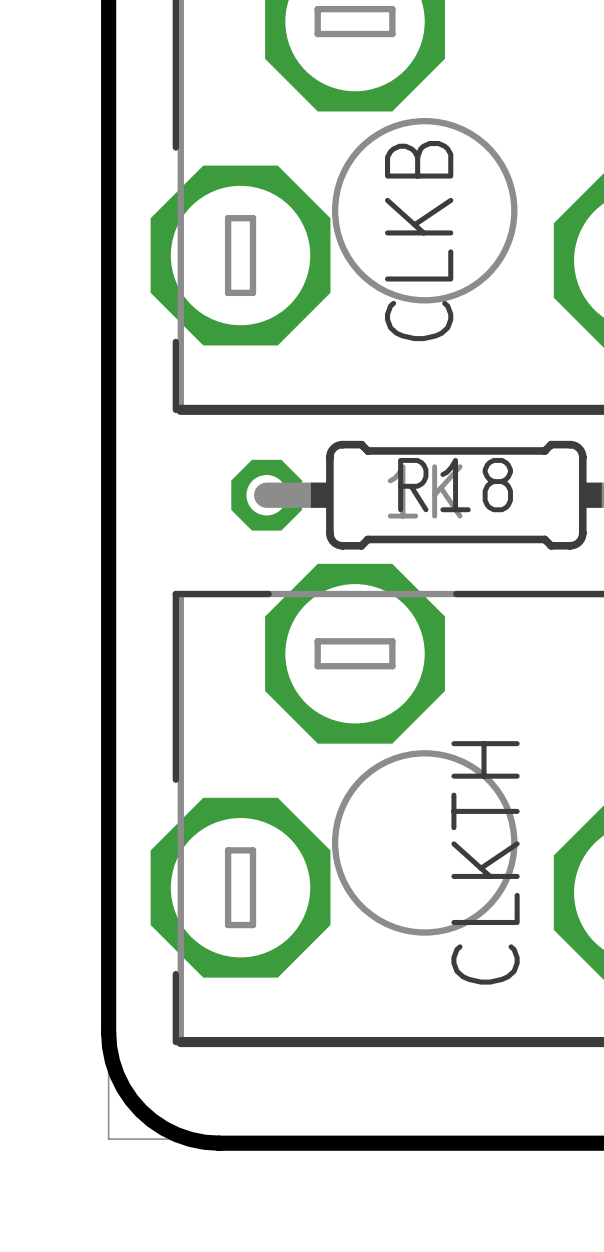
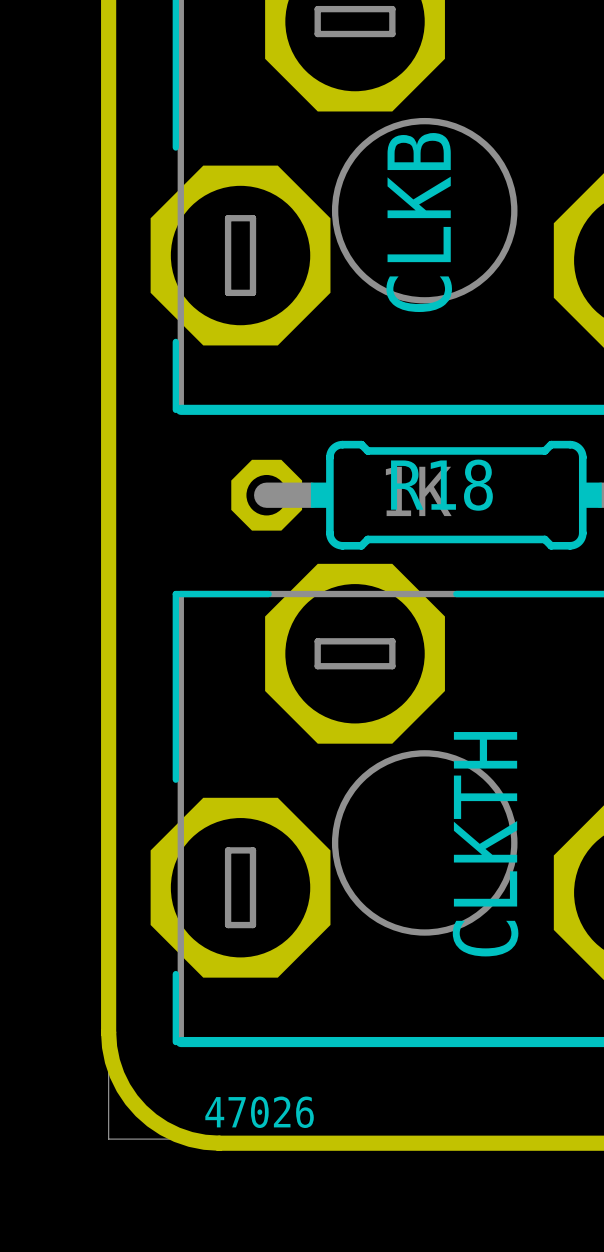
text: none -> 47026 (259, 1112)

